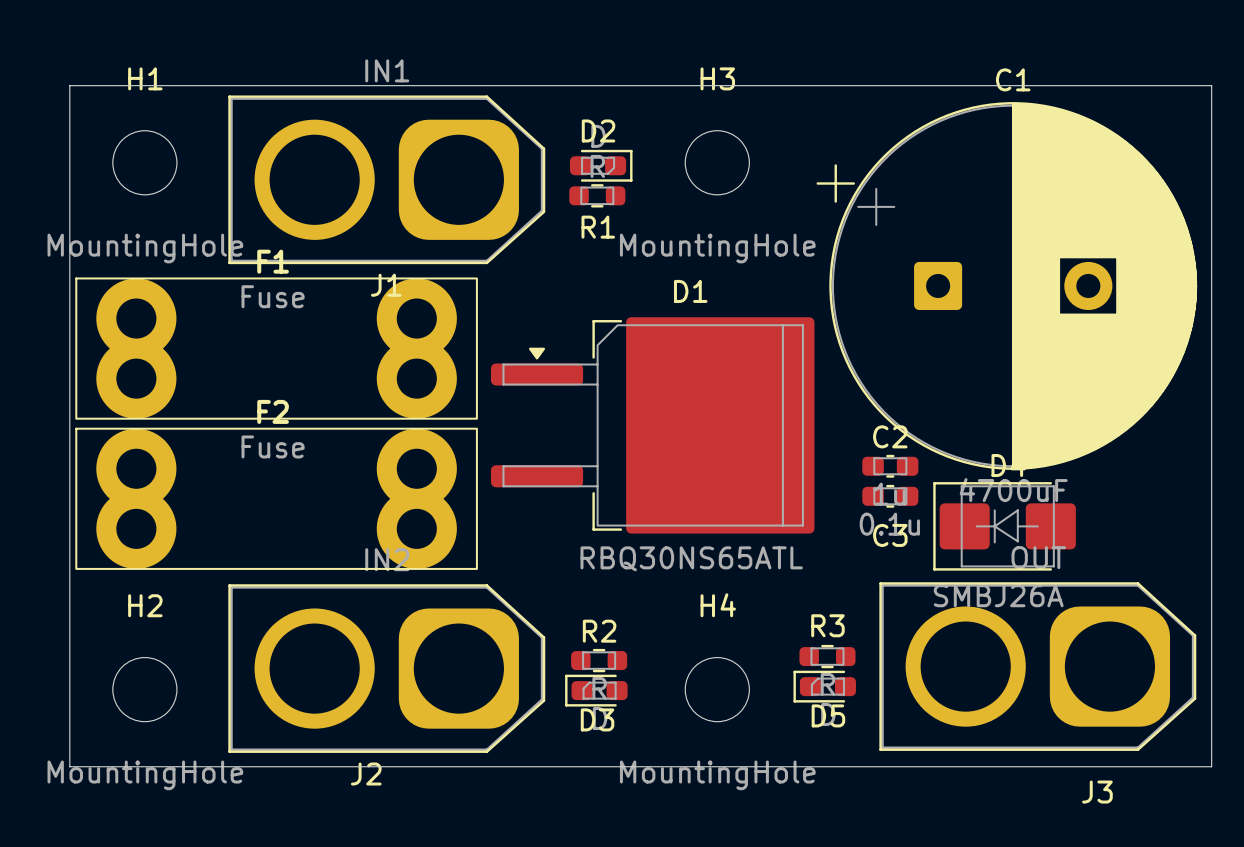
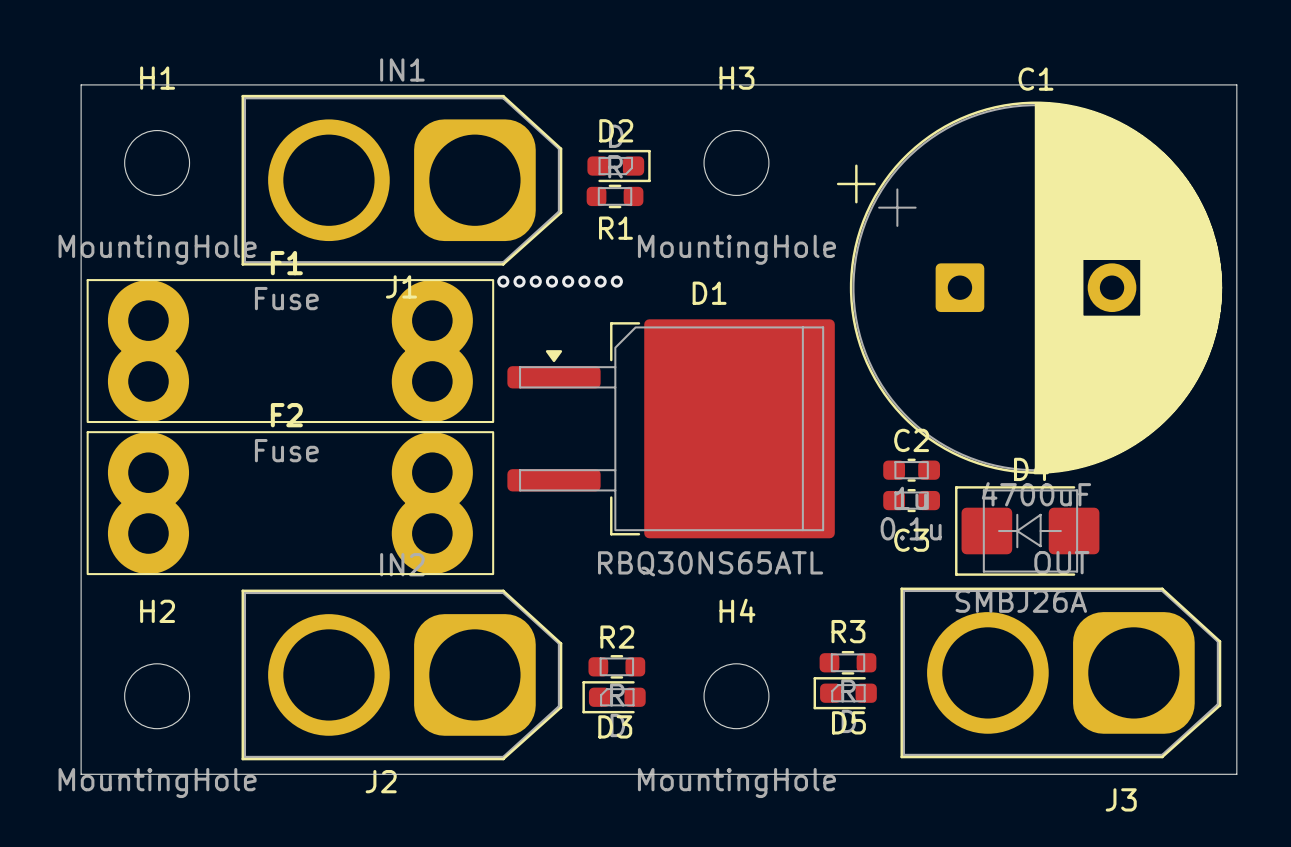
via: none -> (503, 281)
via: none -> (519, 281)
via: none -> (535, 281)
via: none -> (551, 281)
via: none -> (568, 281)
via: none -> (584, 281)
via: none -> (600, 281)
via: none -> (616, 281)

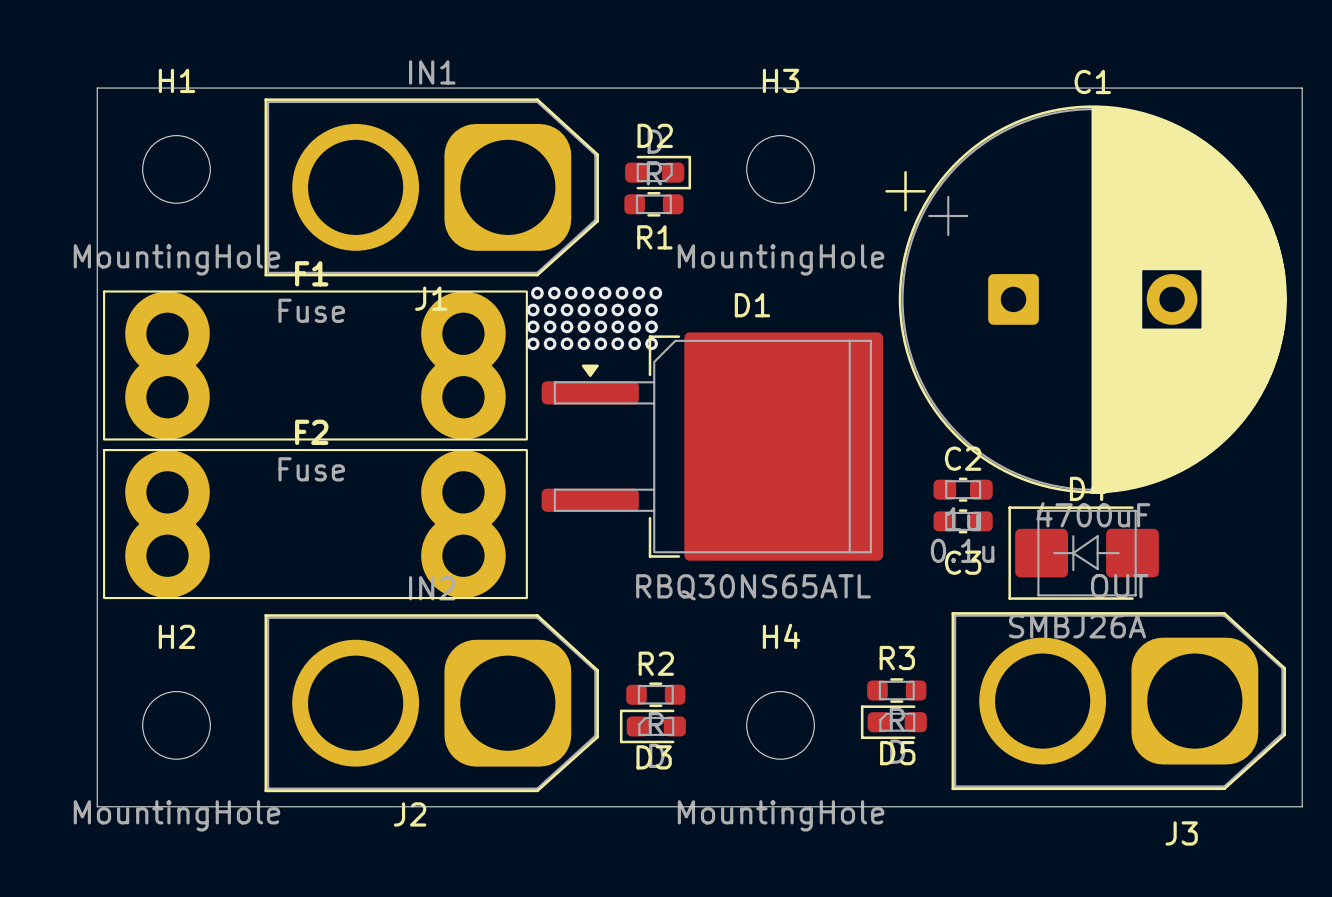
via: none -> (533, 310)
via: none -> (550, 310)
via: none -> (567, 310)
via: none -> (583, 310)
via: none -> (600, 310)
via: none -> (617, 310)
via: none -> (634, 310)
via: none -> (651, 310)
via: none -> (533, 326)
via: none -> (550, 326)
via: none -> (567, 326)
via: none -> (583, 326)
via: none -> (600, 326)
via: none -> (617, 326)
via: none -> (634, 326)
via: none -> (651, 326)
via: none -> (533, 343)
via: none -> (550, 343)
via: none -> (567, 343)
via: none -> (583, 343)
via: none -> (600, 343)
via: none -> (617, 343)
via: none -> (634, 343)
via: none -> (651, 343)

